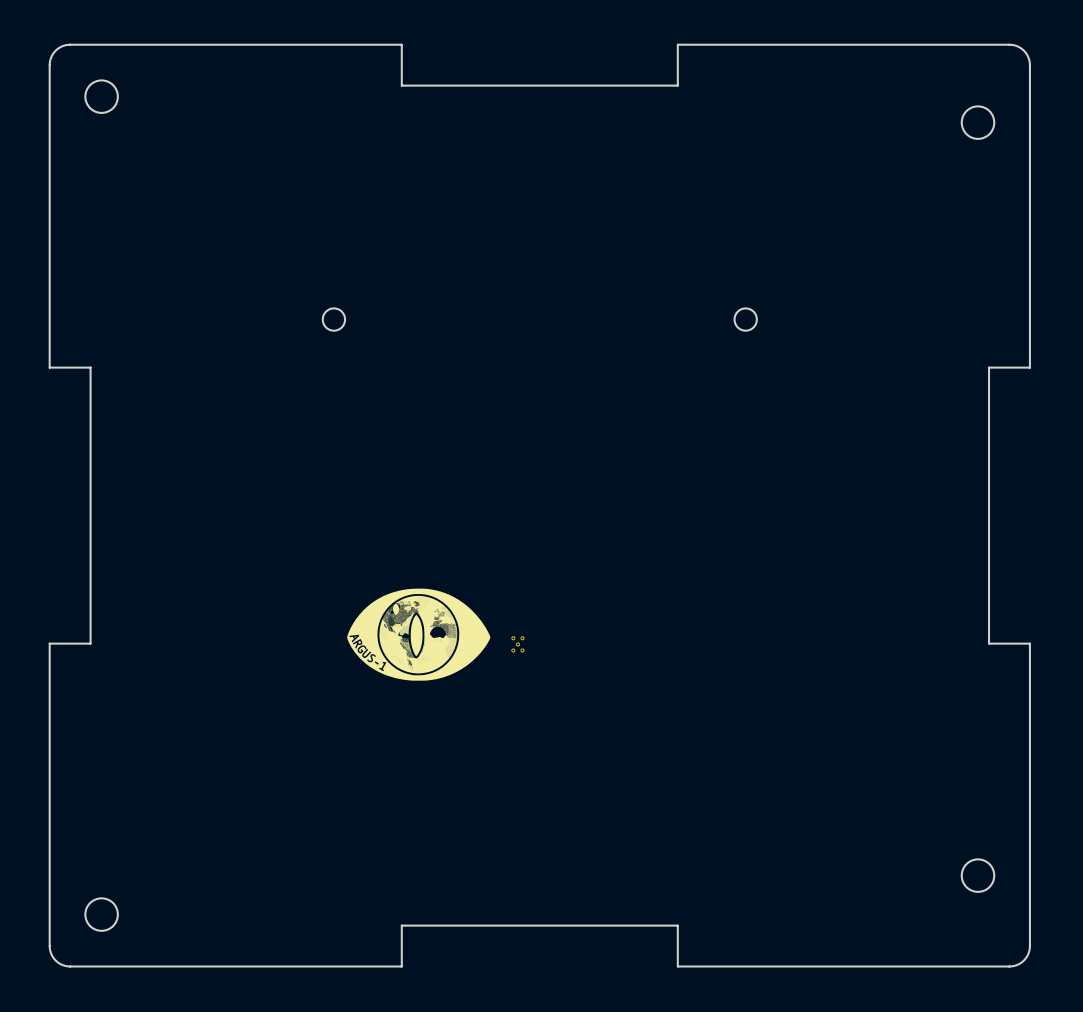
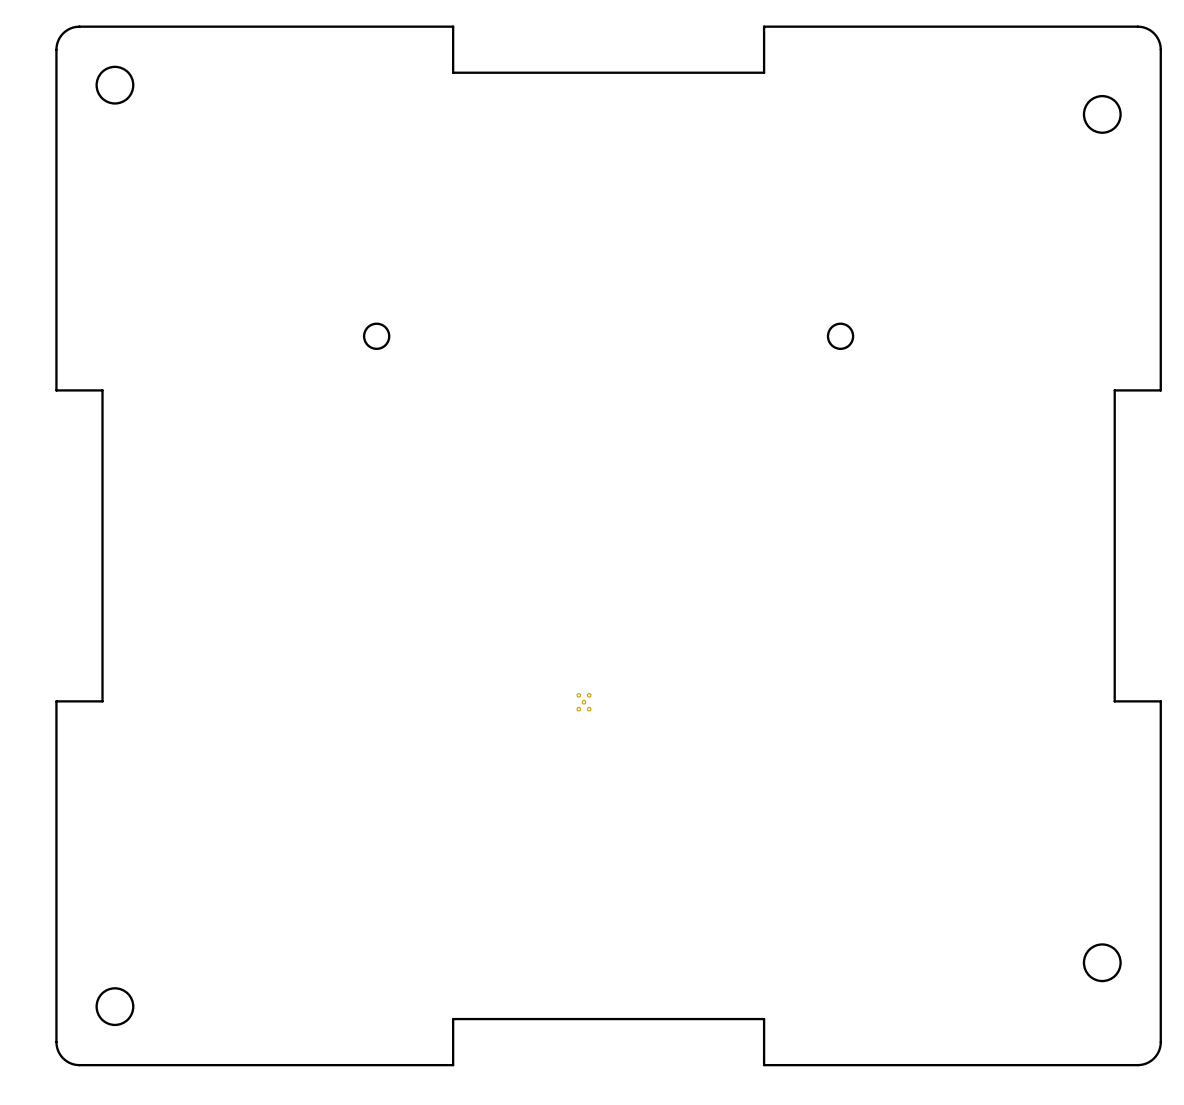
drawing: [347, 588, 491, 681] -> none

